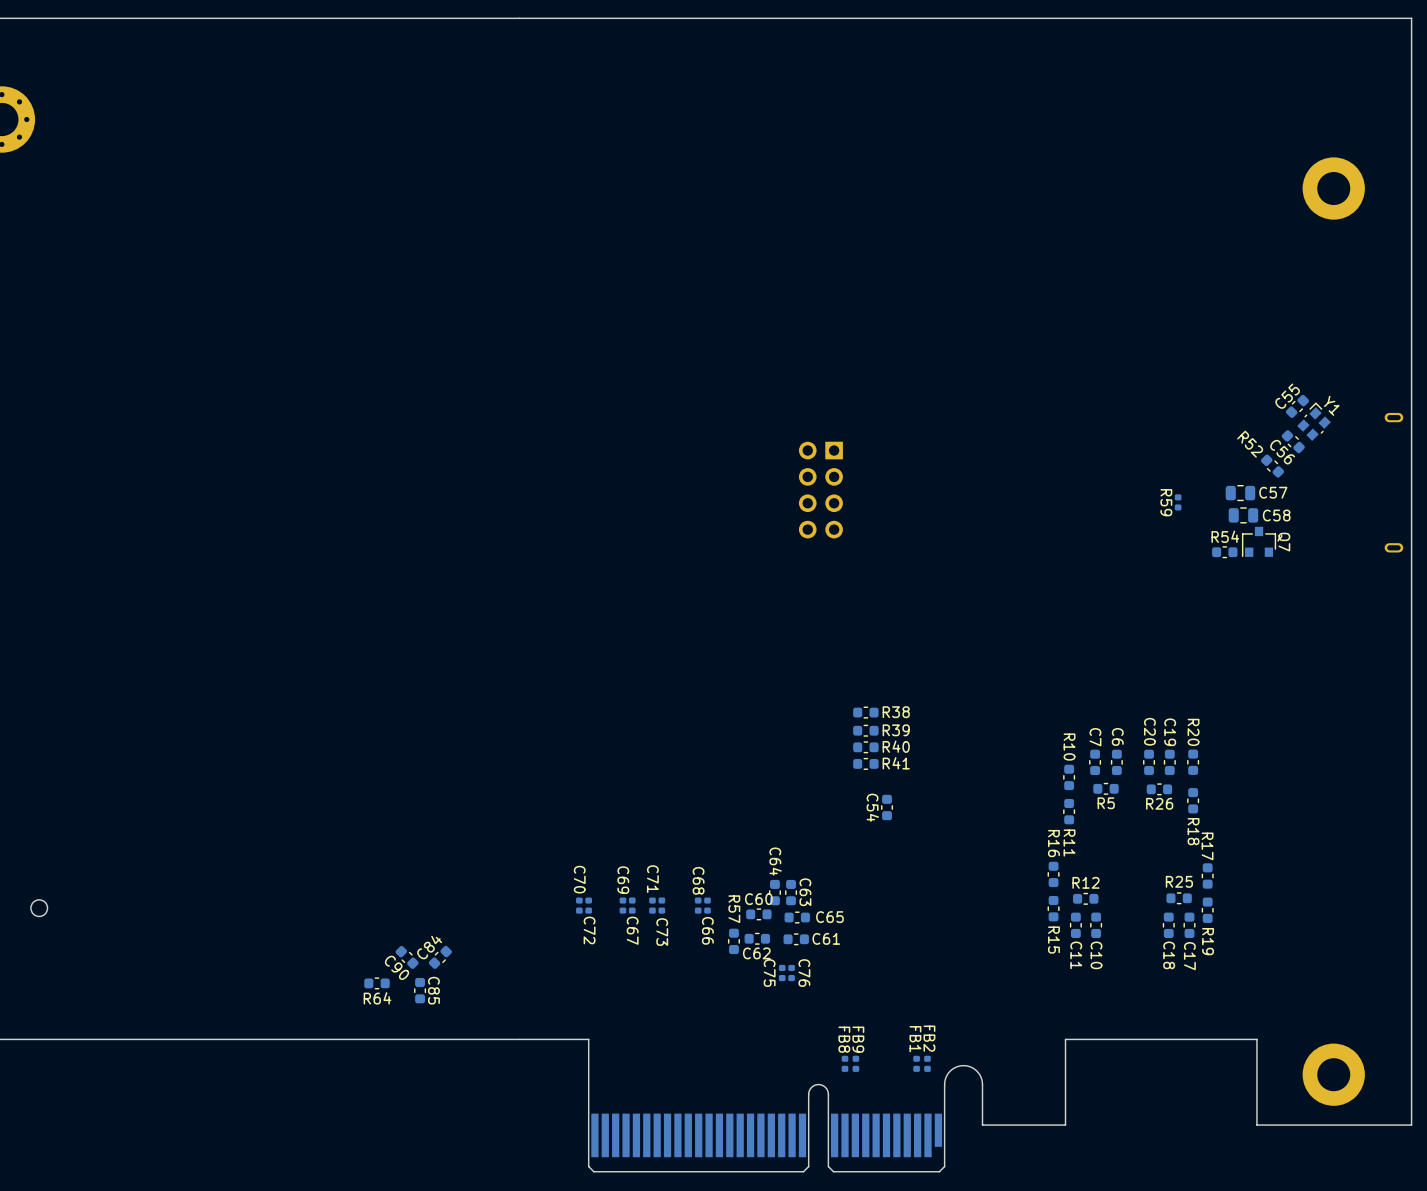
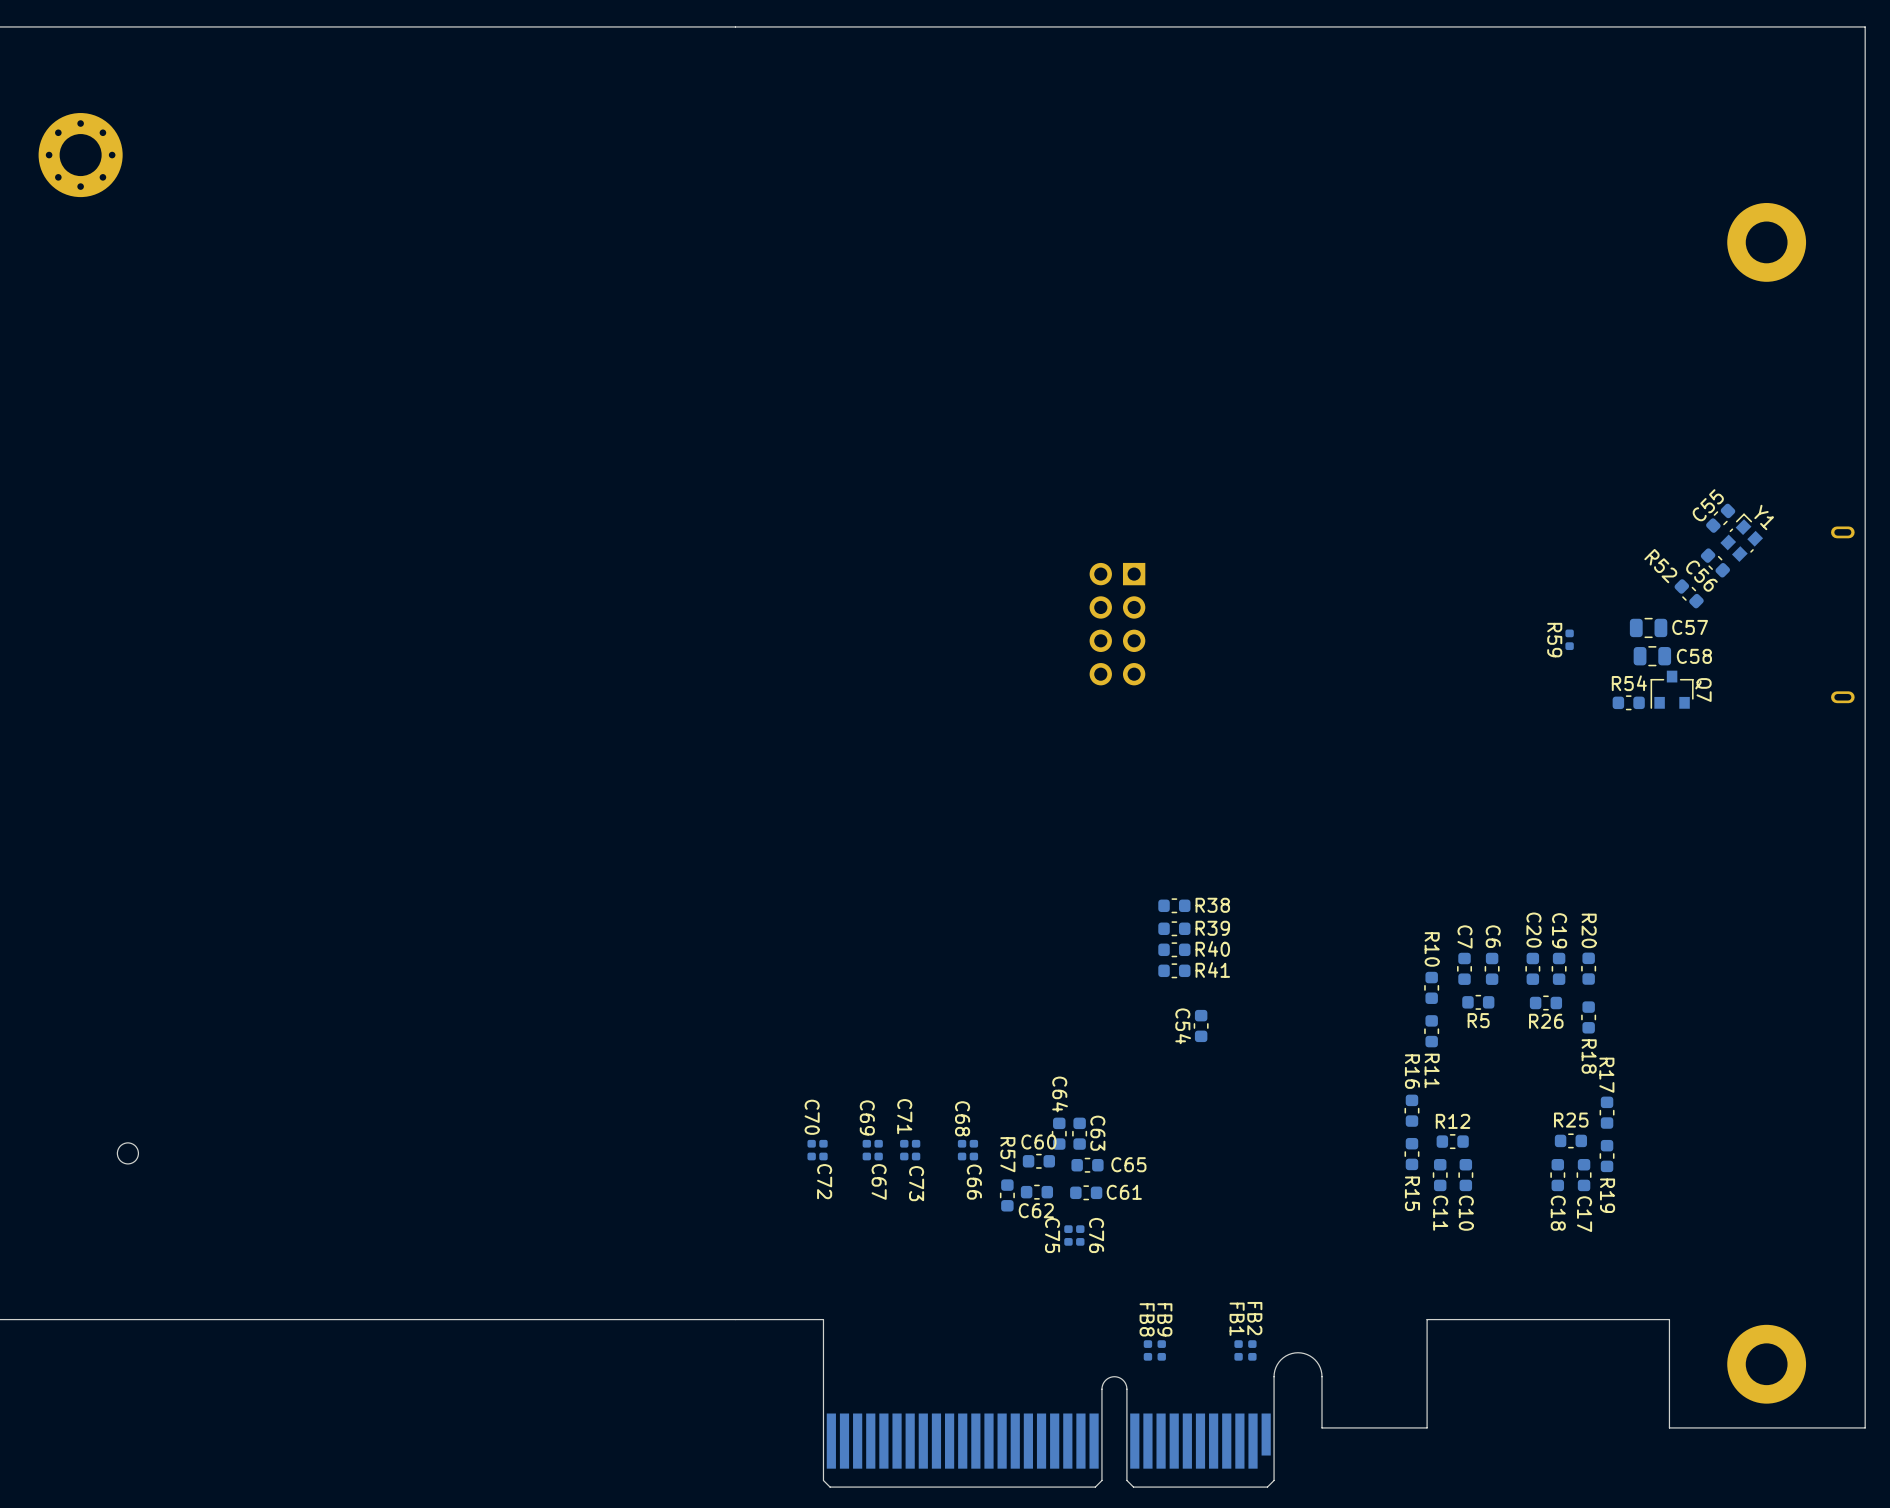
C90: (407, 957) -> none
C84: (440, 957) -> none
R64: (377, 983) -> none
C85: (420, 990) -> none

